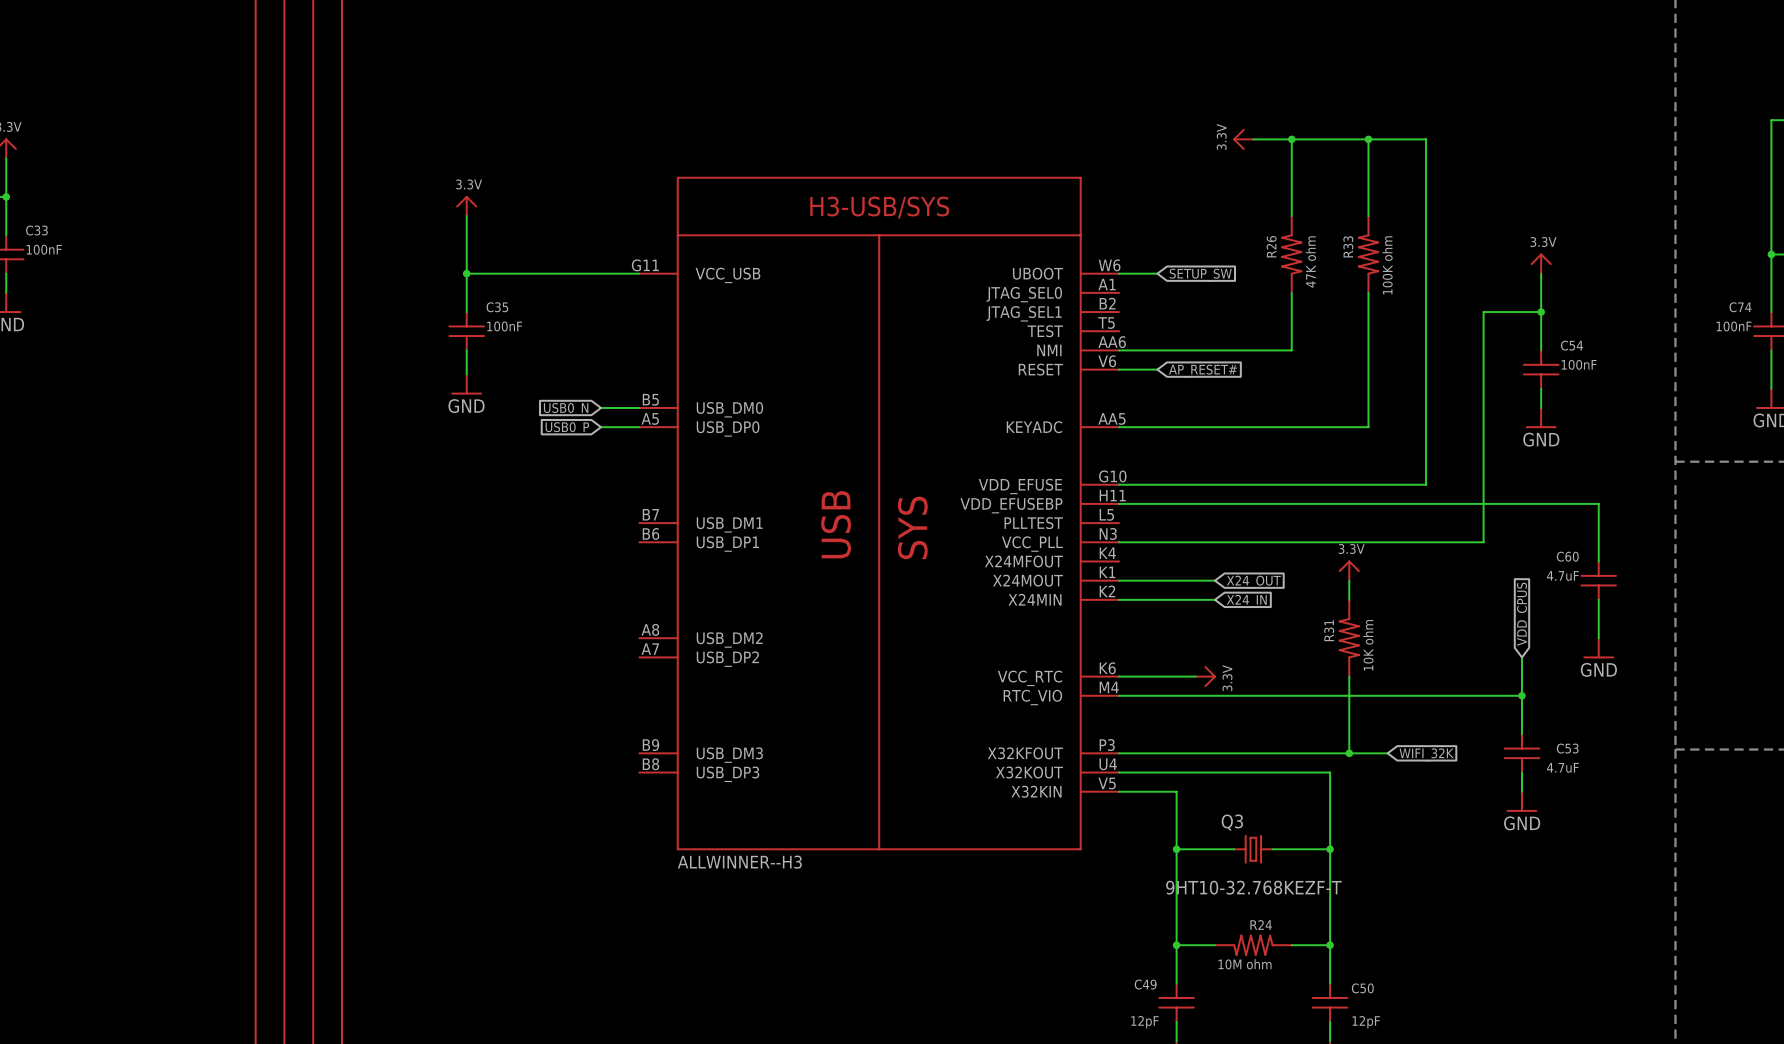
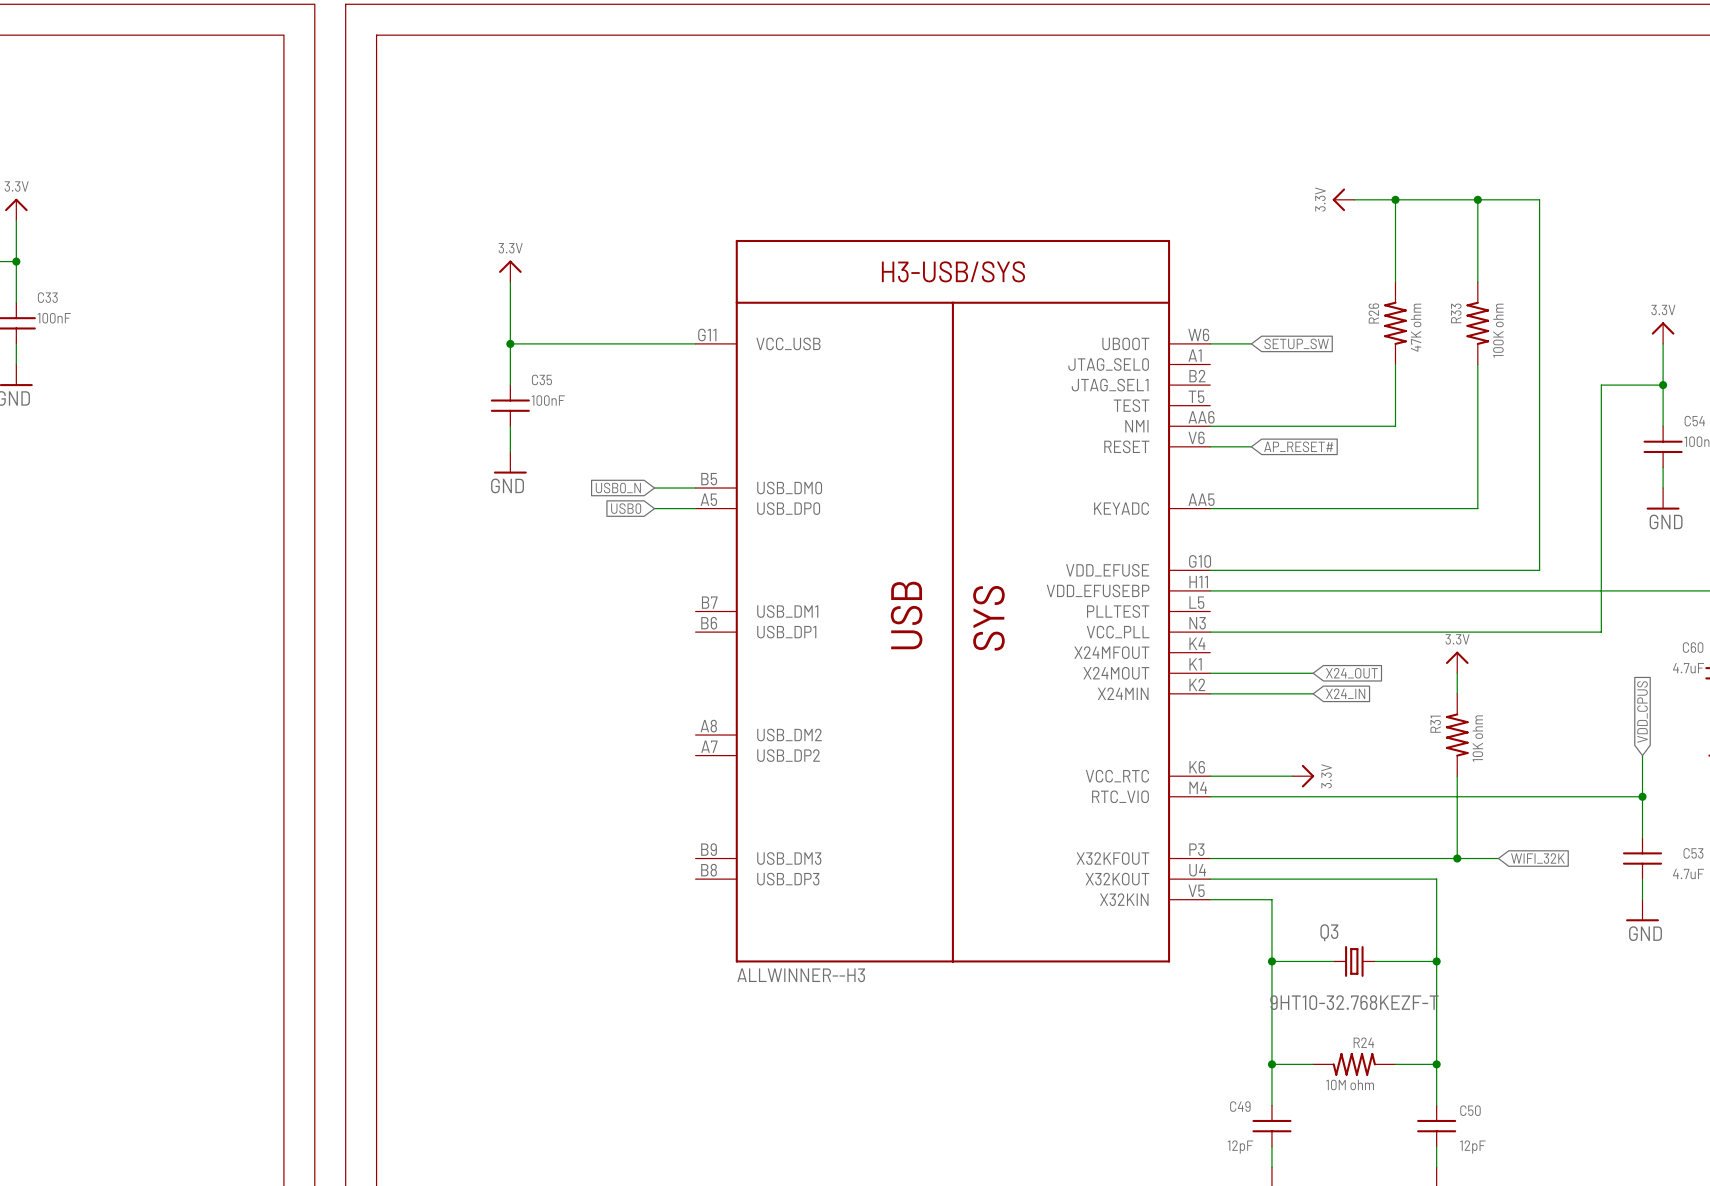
global label: USB0_P (567, 428) -> USB0 (626, 508)

